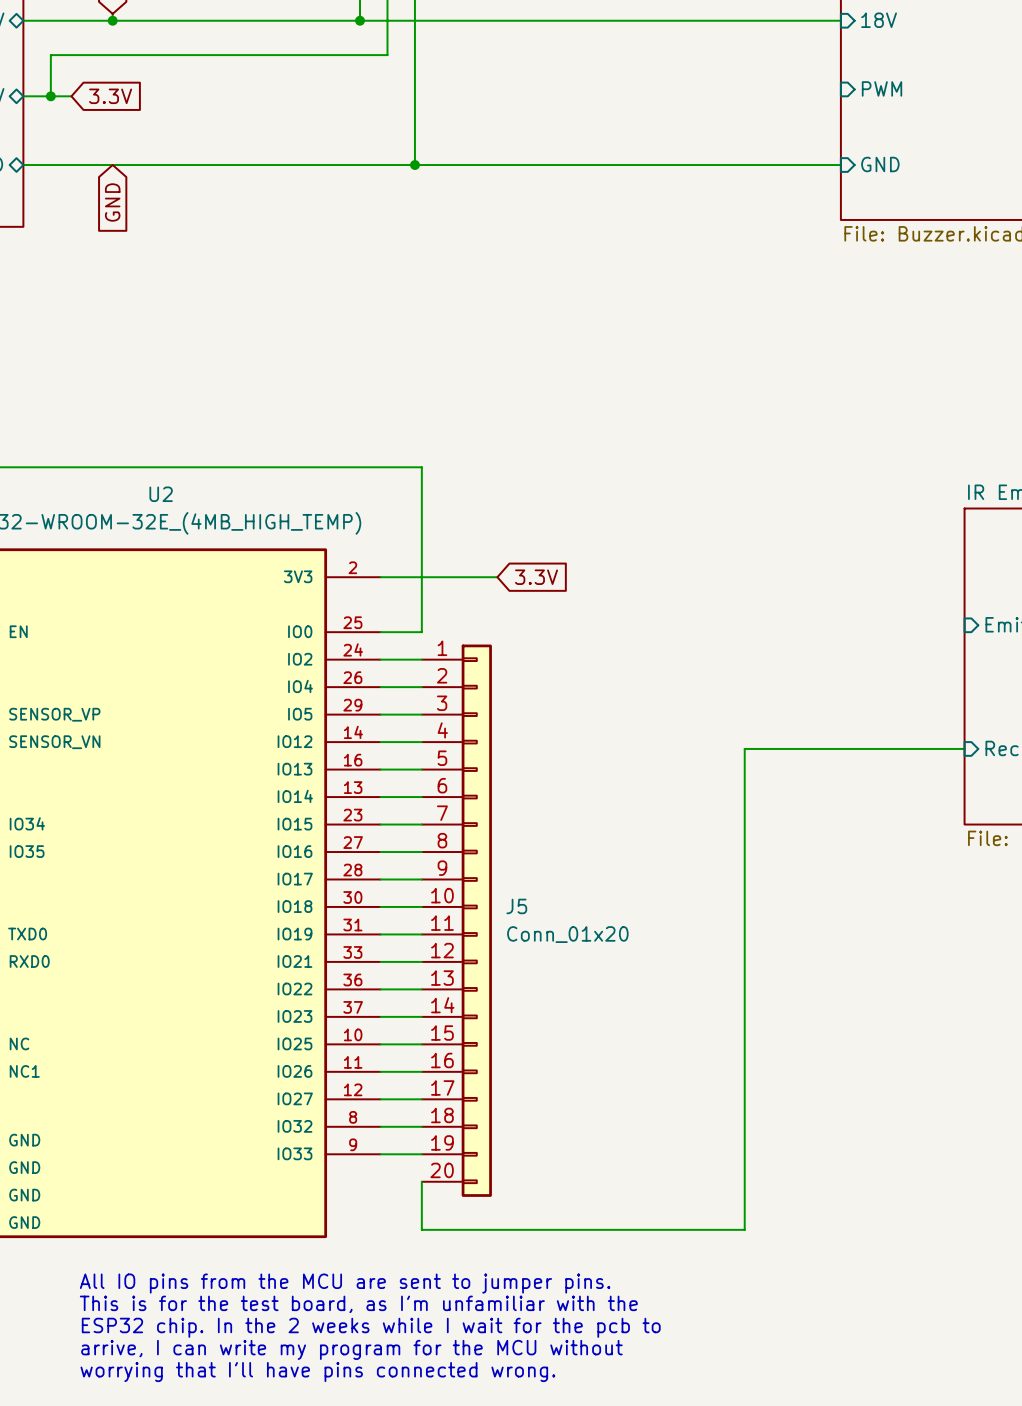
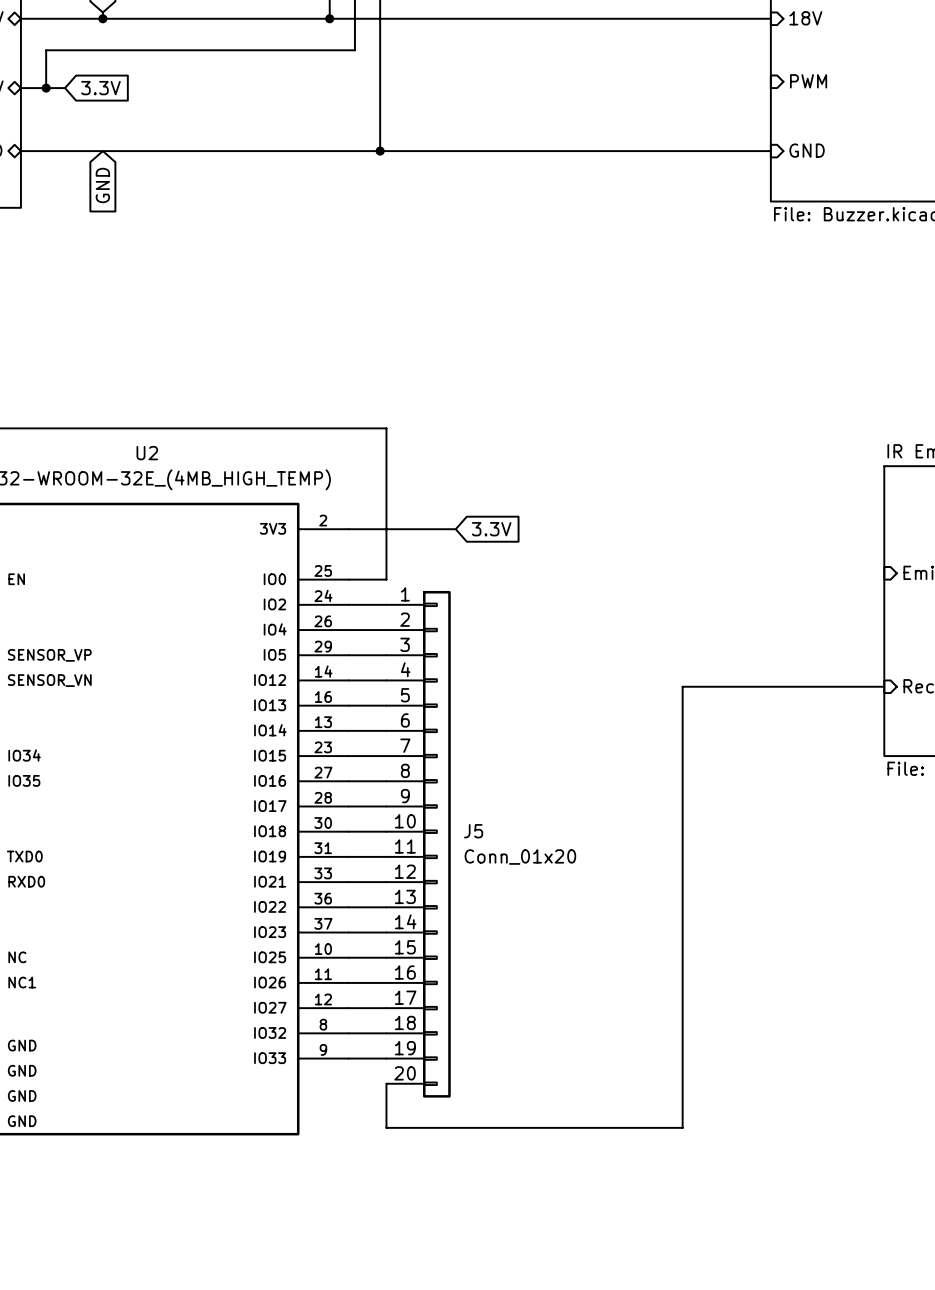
text: All IO pins from the MCU are sent to jumper pins. (345, 1283) -> none
text: This is for the test board, as I'm unfamiliar with the (358, 1304) -> none
text: ESP32 chip. In the 2 weeks while I wait for the pcb to (371, 1327) -> none
text: arrive, I can write my program for the MCU without (351, 1349) -> none
text: worrying that I'll have pins connected wrong. (317, 1372) -> none

